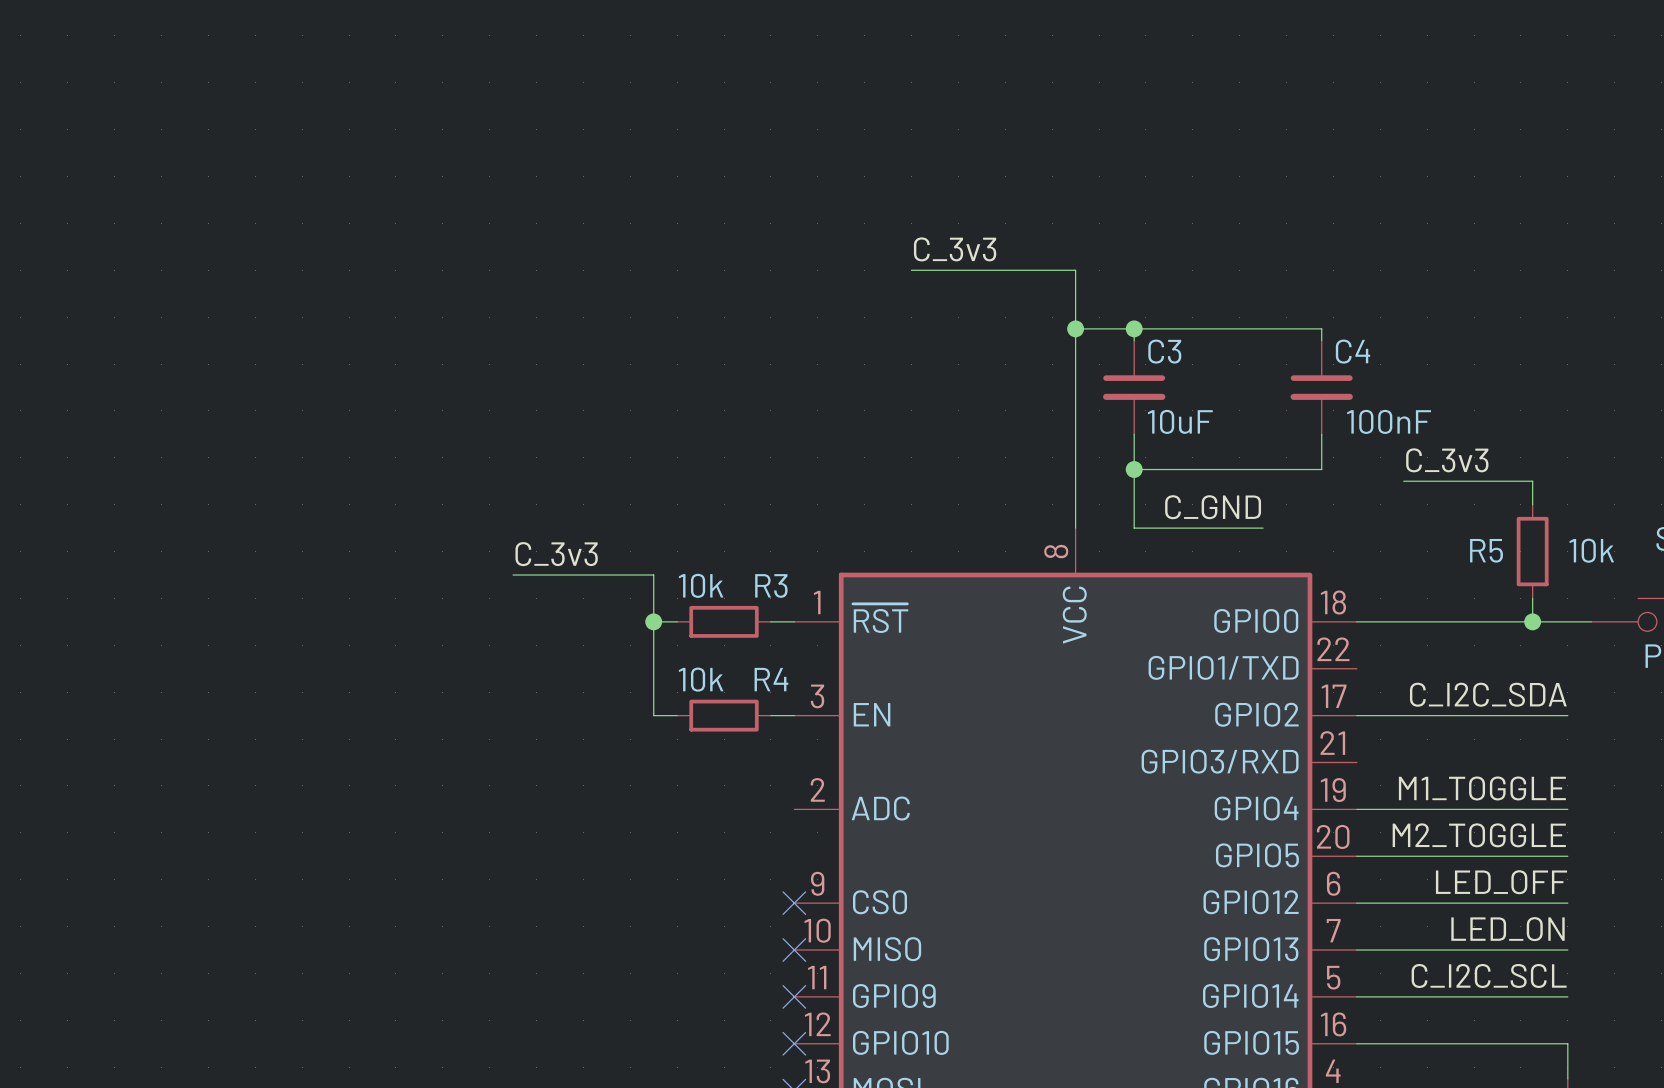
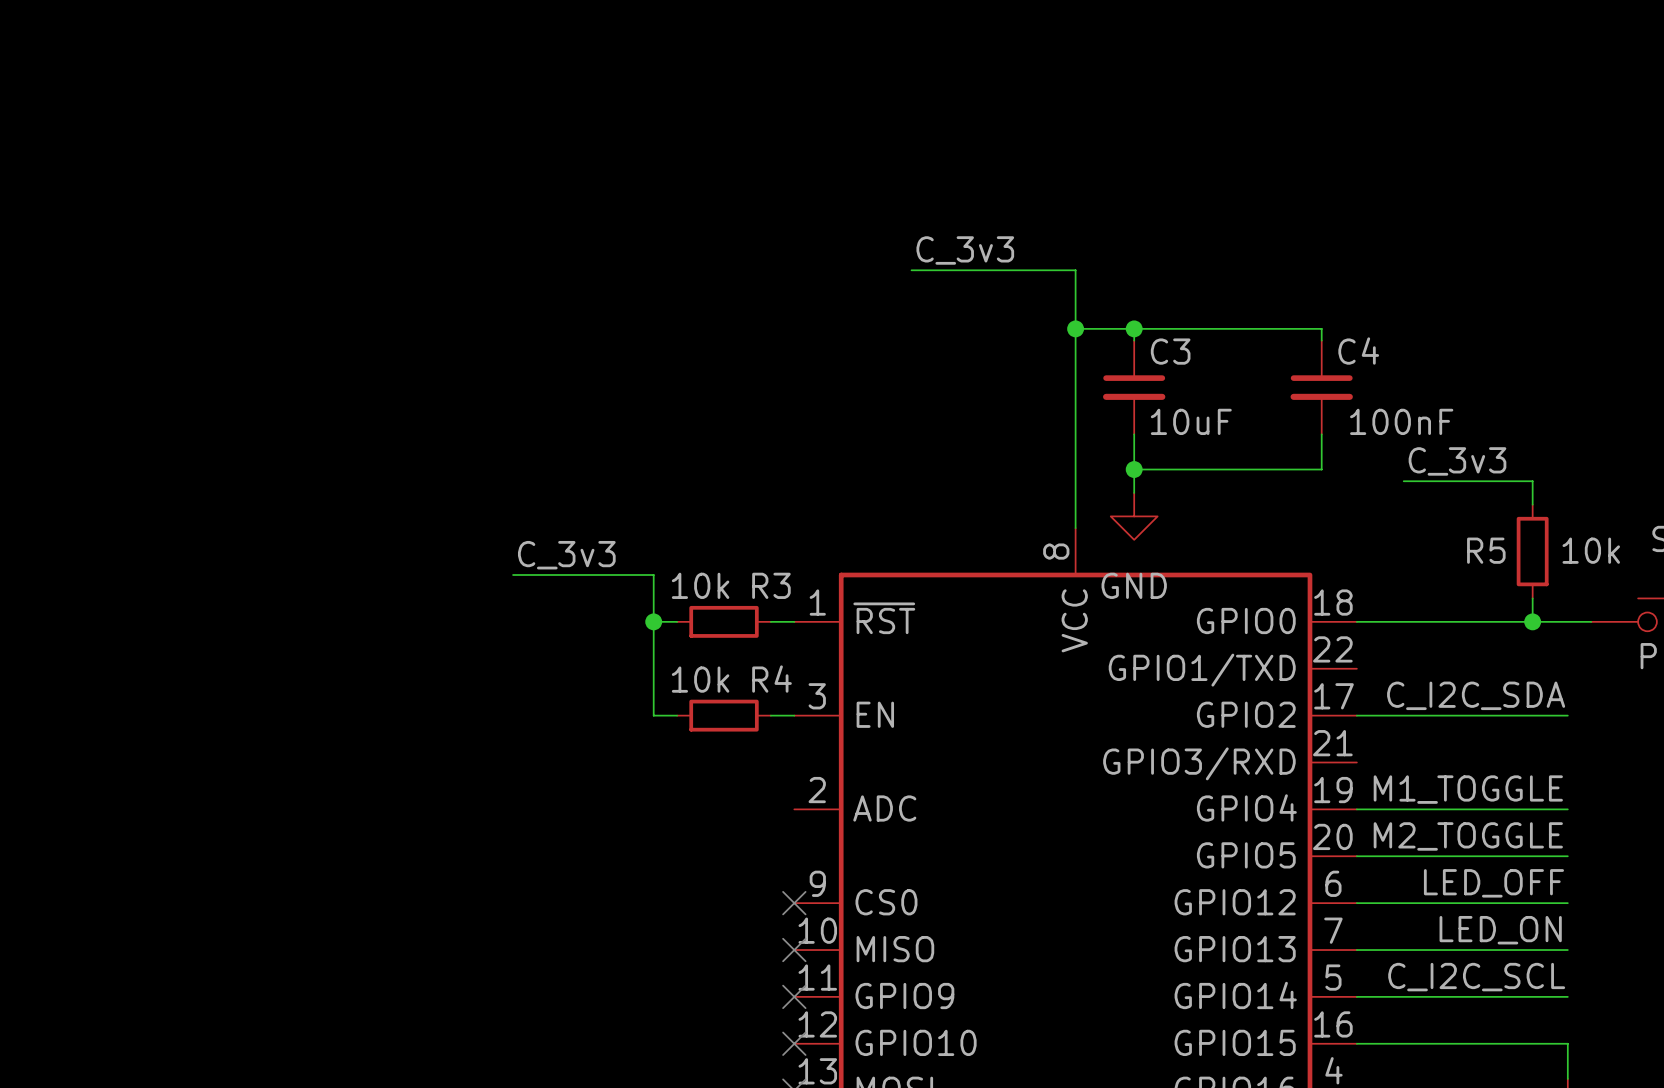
wire: (1134, 492) (1134, 528) (1263, 528) -> none
label: C_GND (1213, 507) -> none
power symbol: none -> GND (1134, 516)

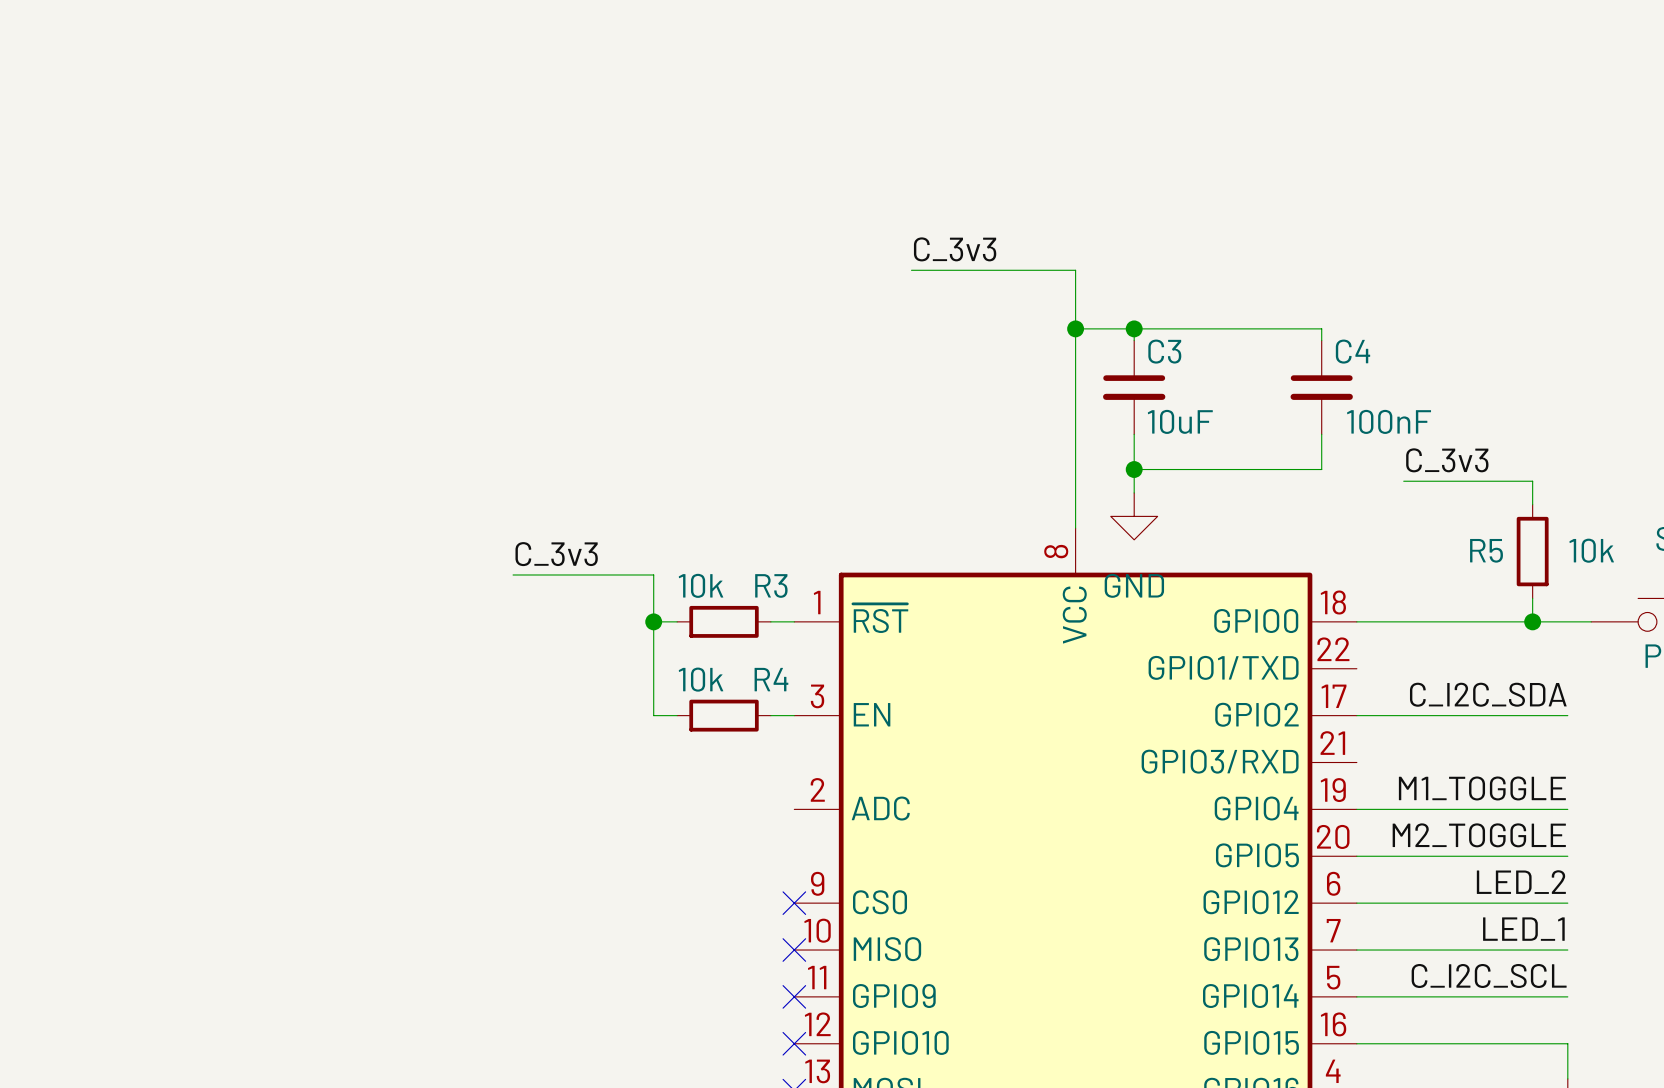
label: LED_OFF (1493, 883) -> LED_2 (1521, 882)
label: LED_ON (1500, 930) -> LED_1 (1523, 929)

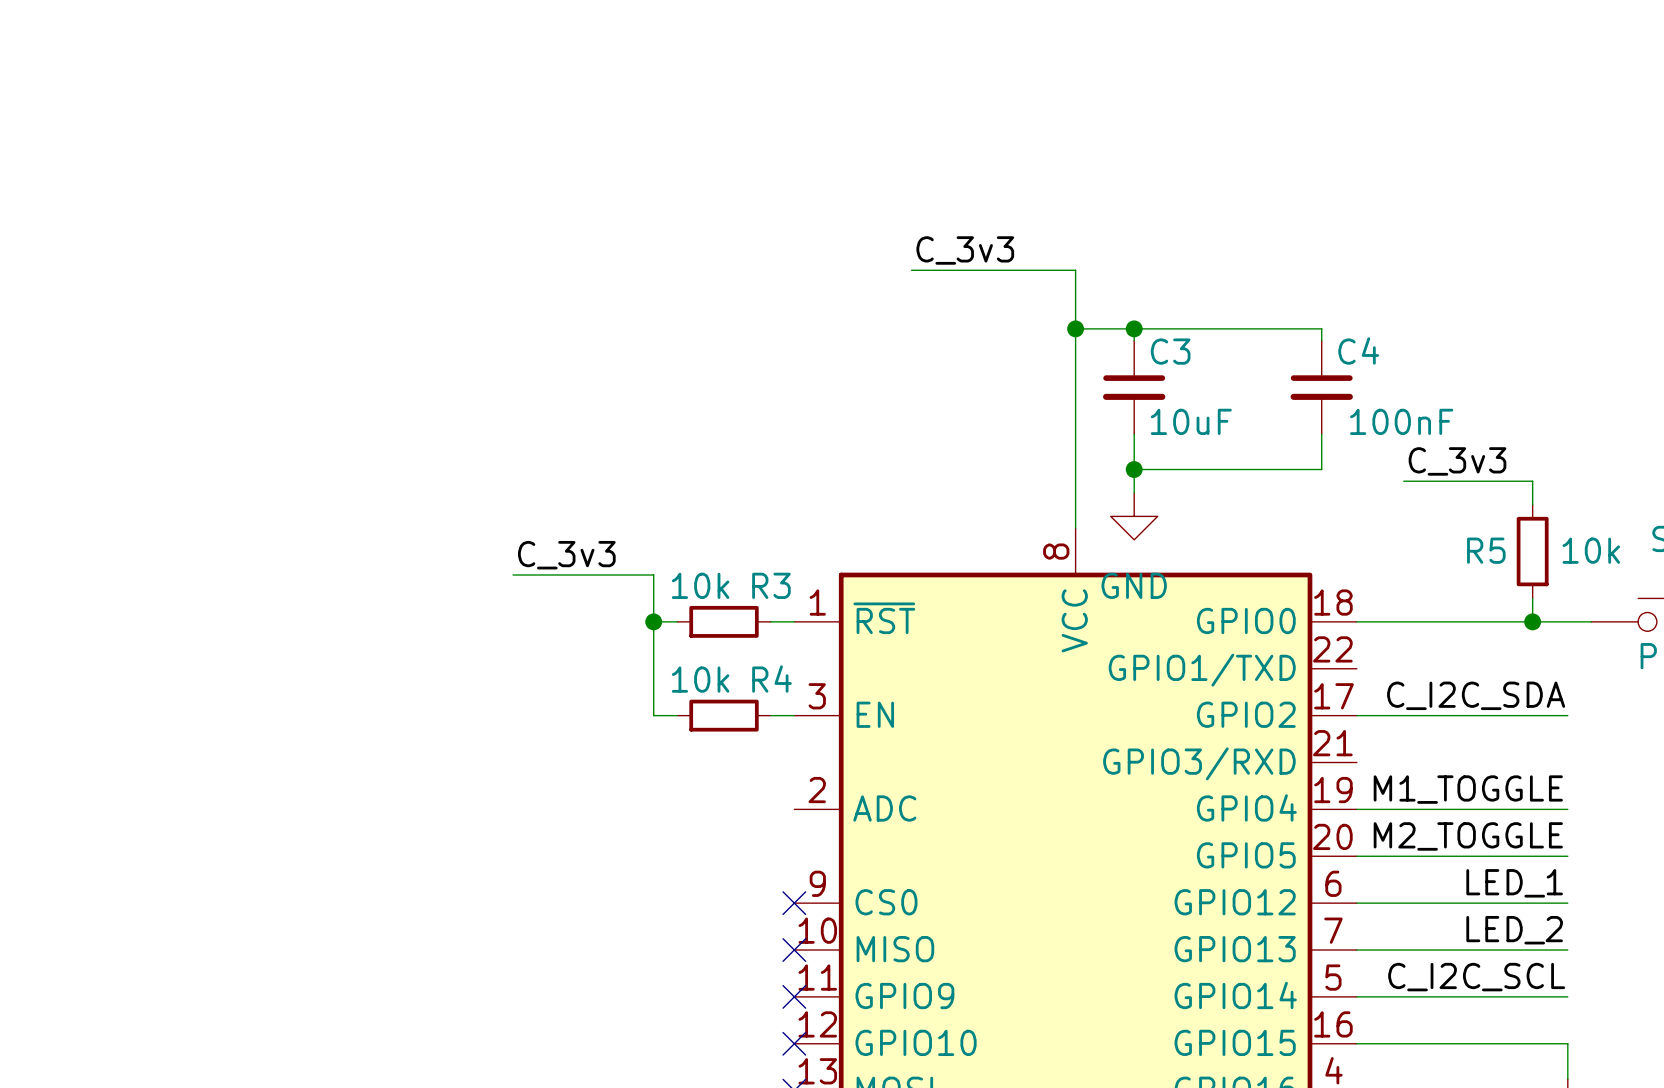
label: LED_2 (1521, 882) -> LED_1 (1514, 883)
label: LED_1 (1523, 929) -> LED_2 (1514, 930)

